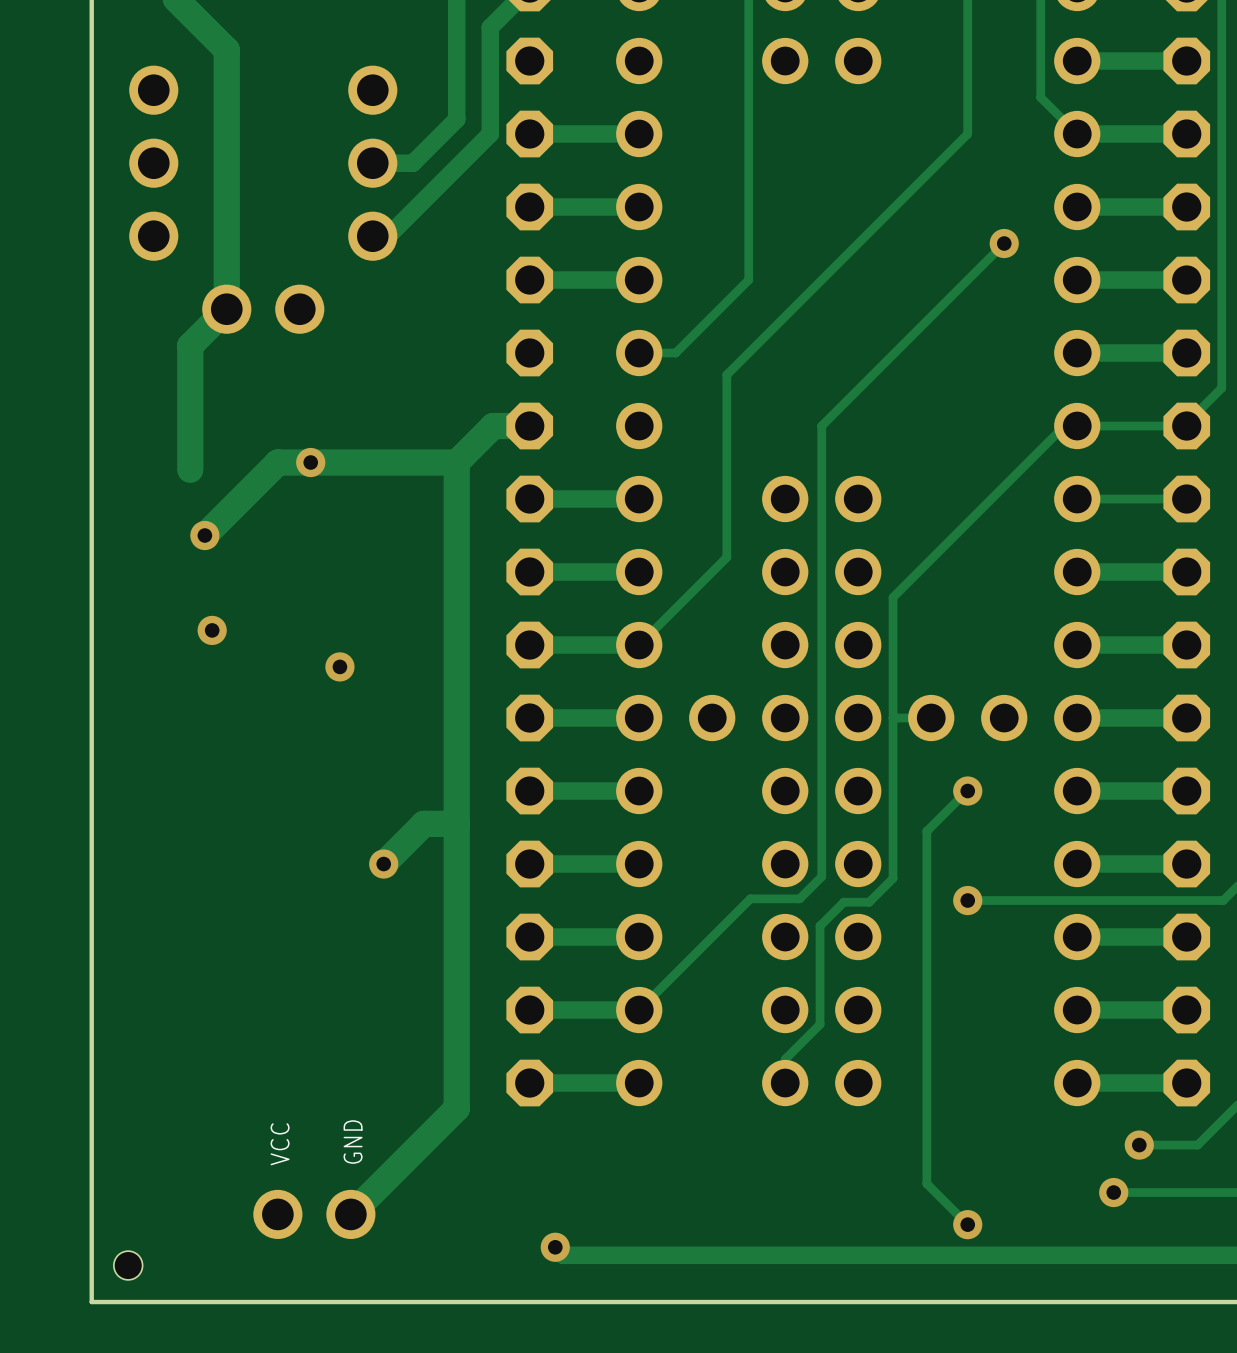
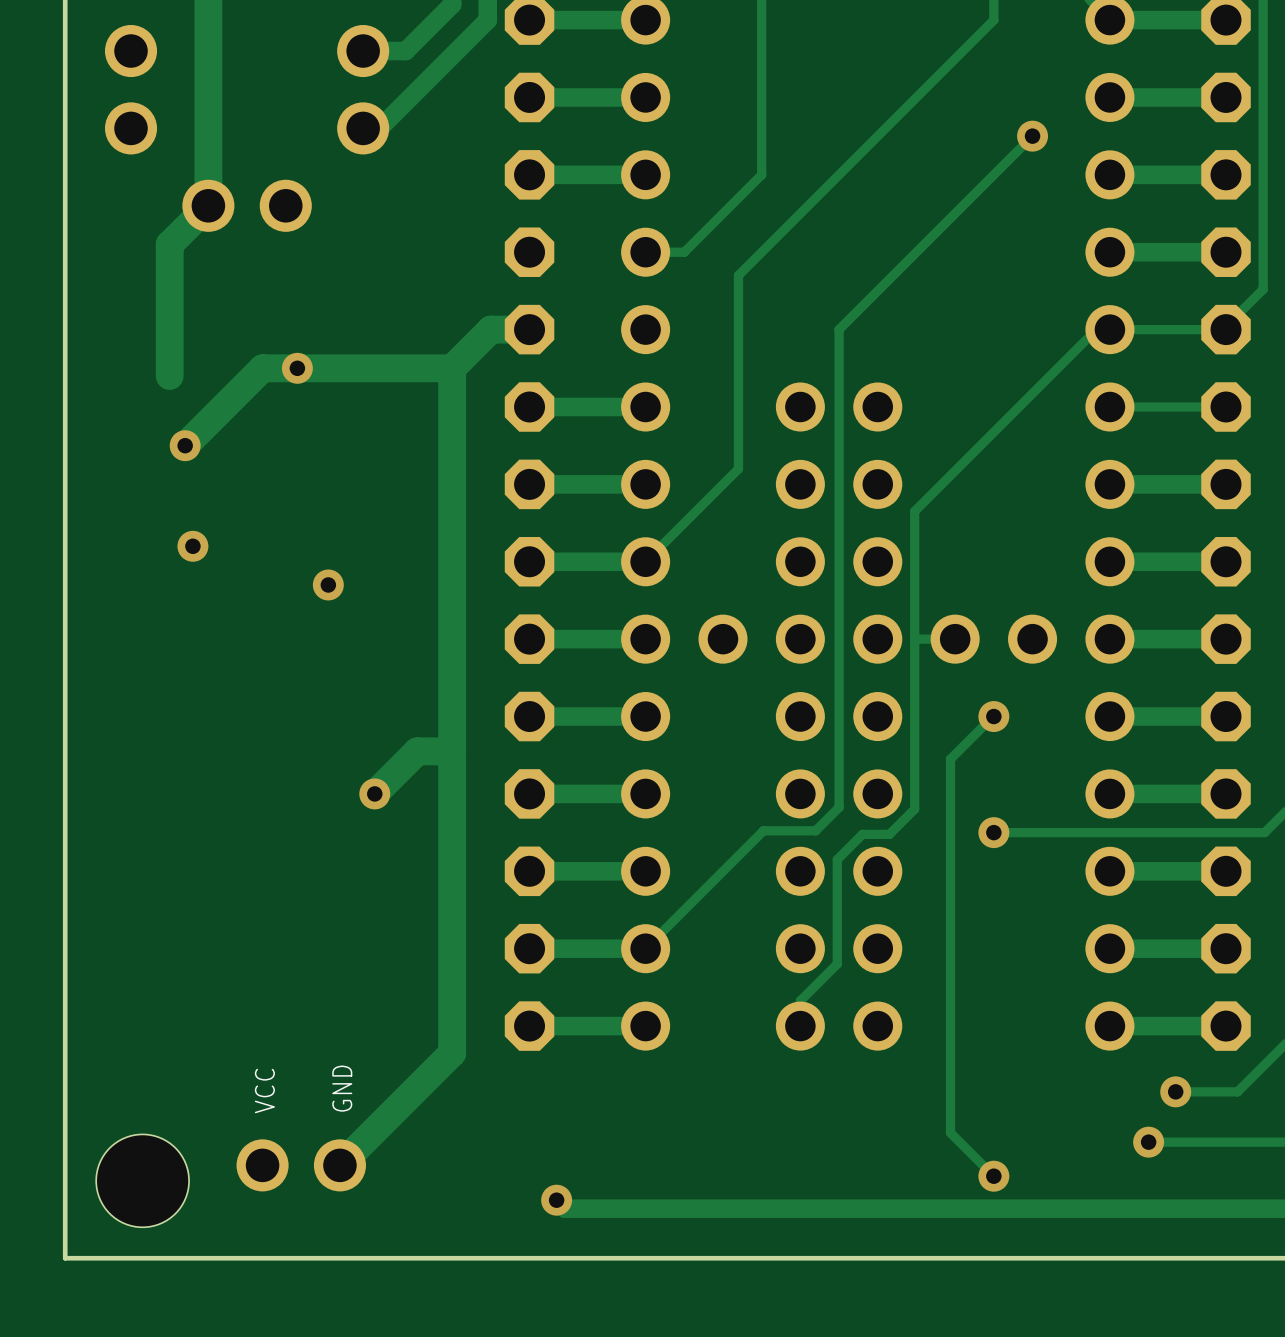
hole: none -> (142, 1180)
hole: (128, 1265) -> none

